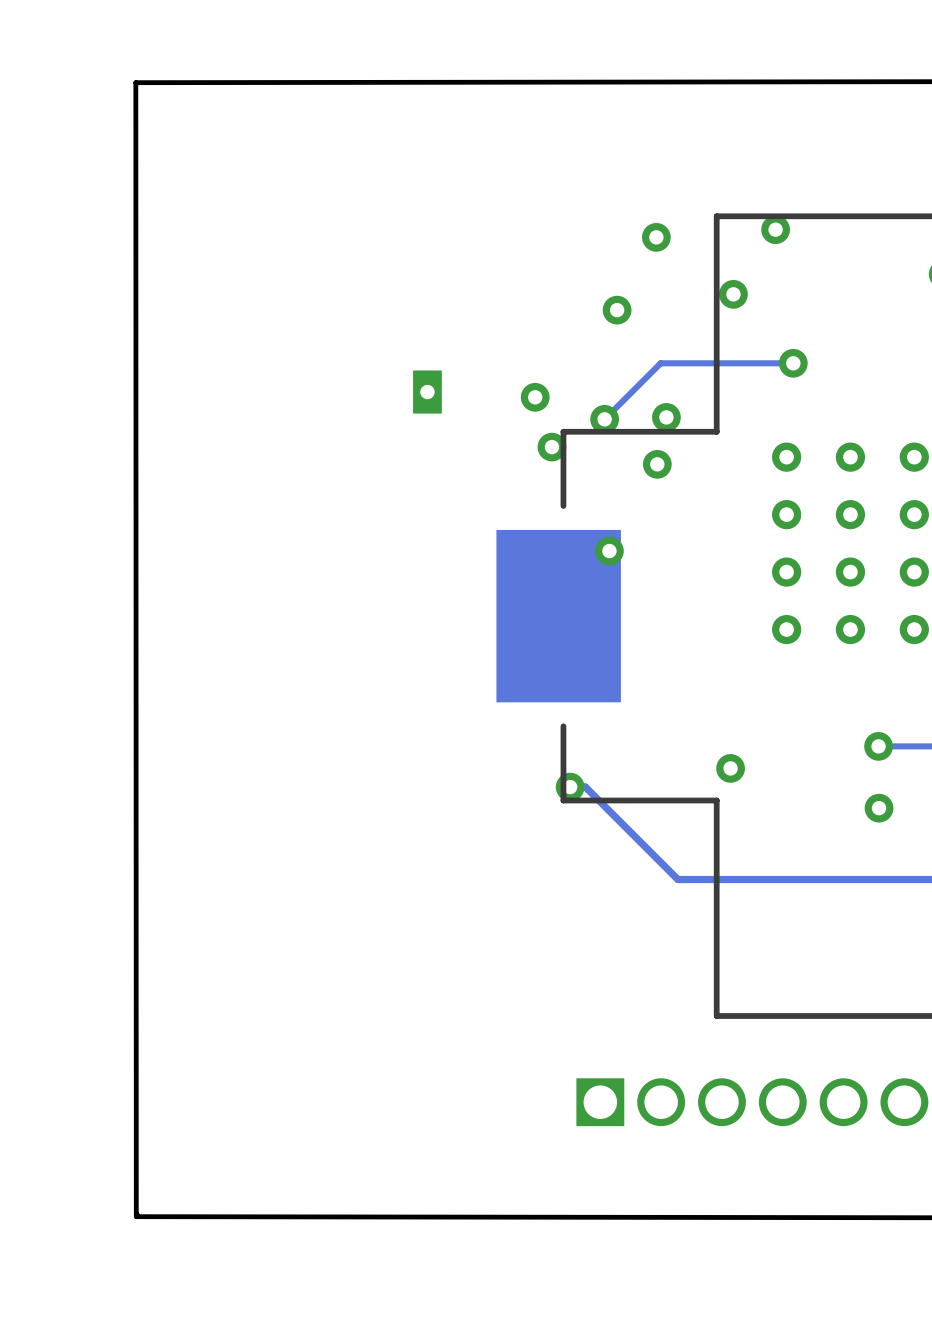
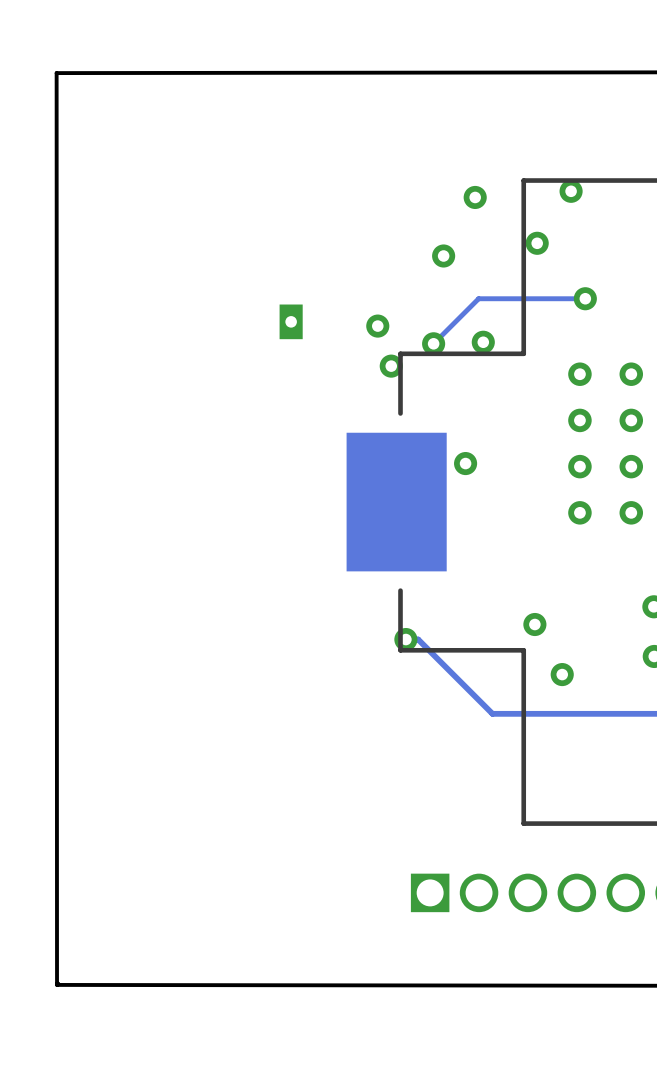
via: (657, 464) -> none
via position: (609, 551) -> (465, 463)
via: none -> (562, 674)

